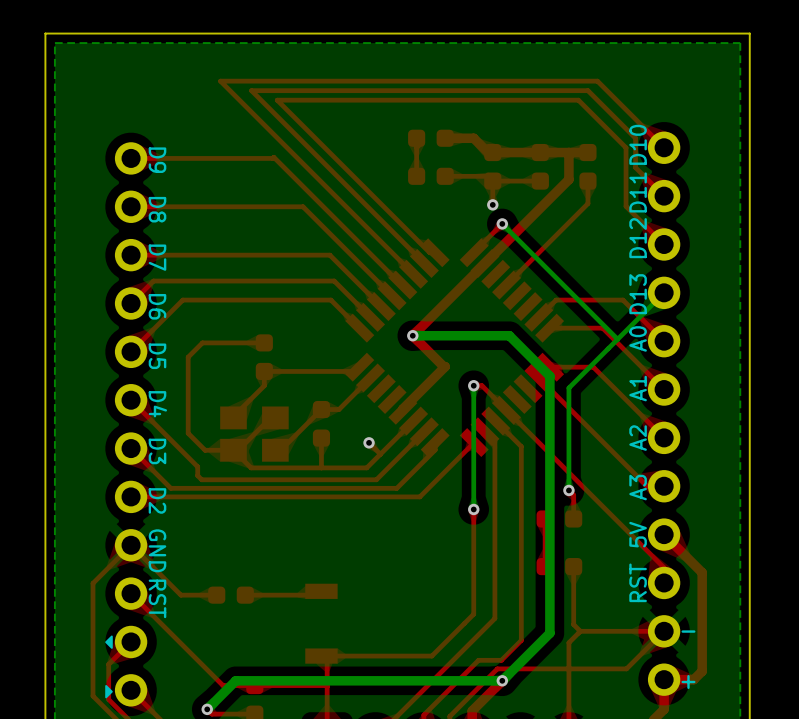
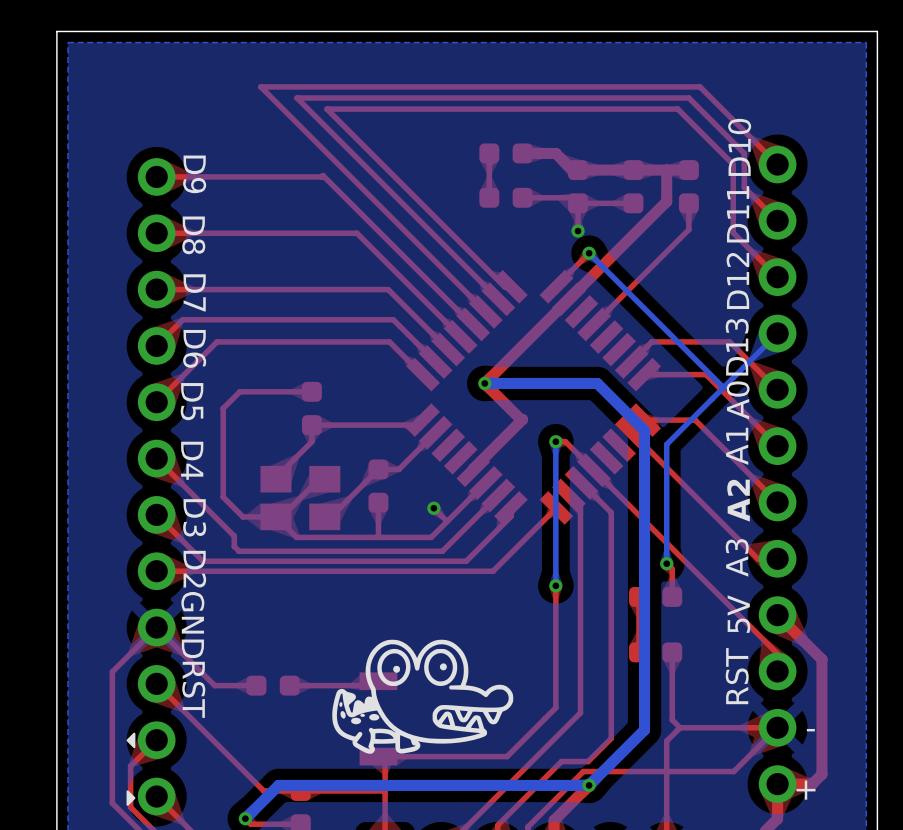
part footprint: [647, 131, 681, 696] -> [758, 145, 797, 803]
part footprint: [105, 142, 148, 707] -> [126, 158, 176, 816]
drawing: none -> [332, 639, 514, 754]

